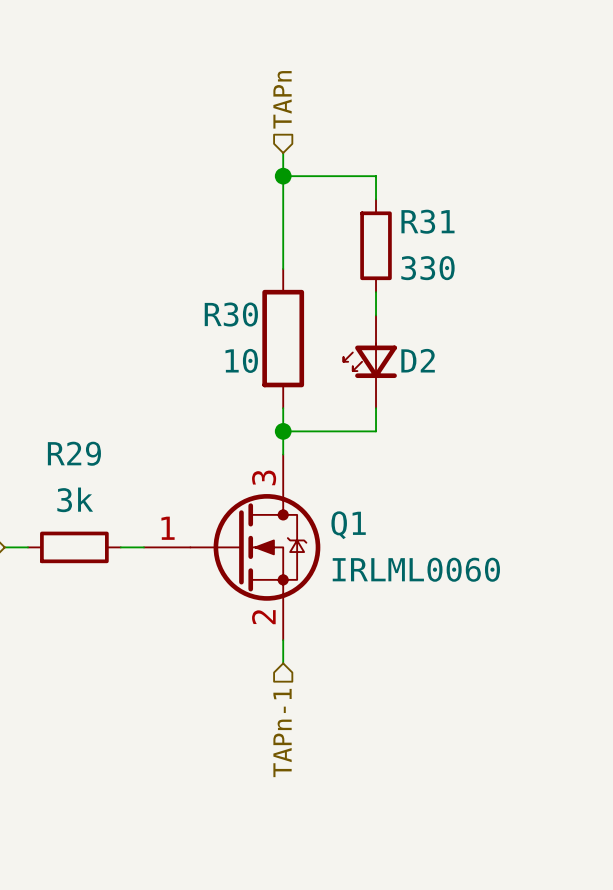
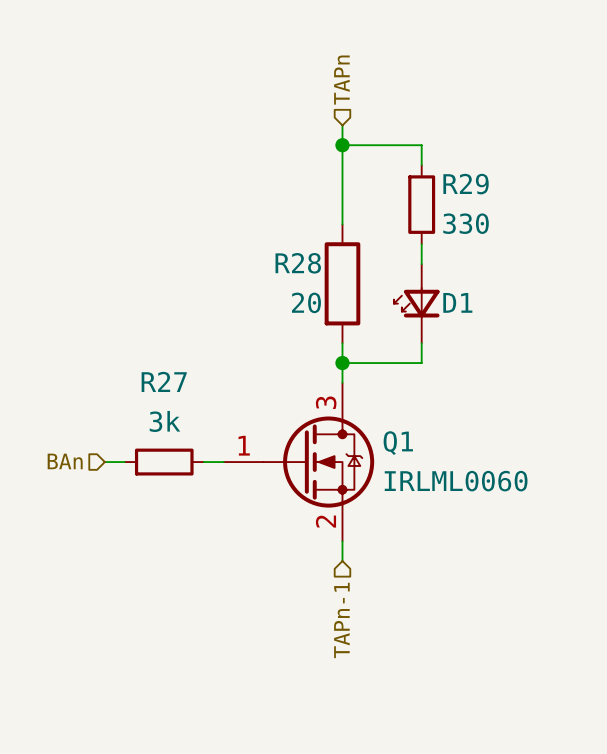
R31 name: R31 (427, 221) -> R29 (466, 184)
R30 name: R30 (231, 314) -> R28 (298, 263)
R30 value: 10 (241, 360) -> 20 (306, 302)
D2 name: D2 (418, 360) -> D1 (457, 302)
R29 name: R29 (74, 453) -> R27 (164, 381)

